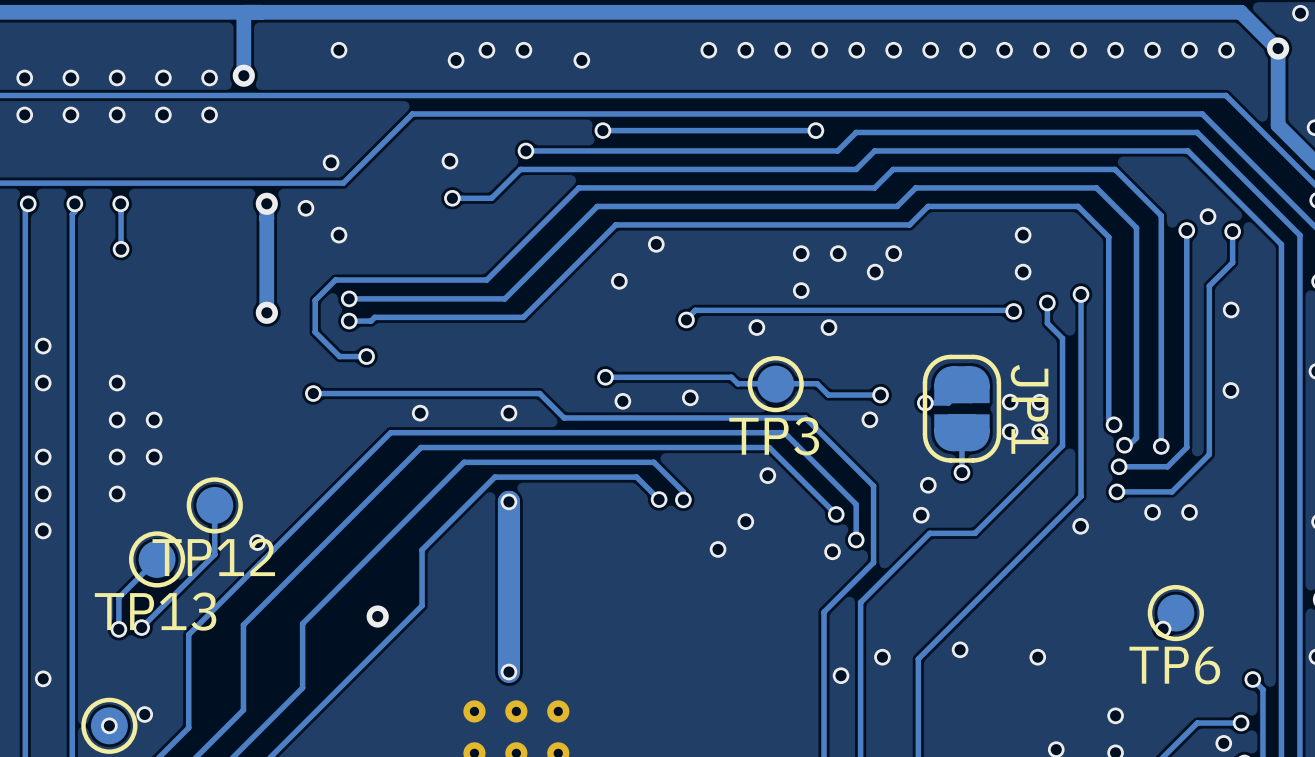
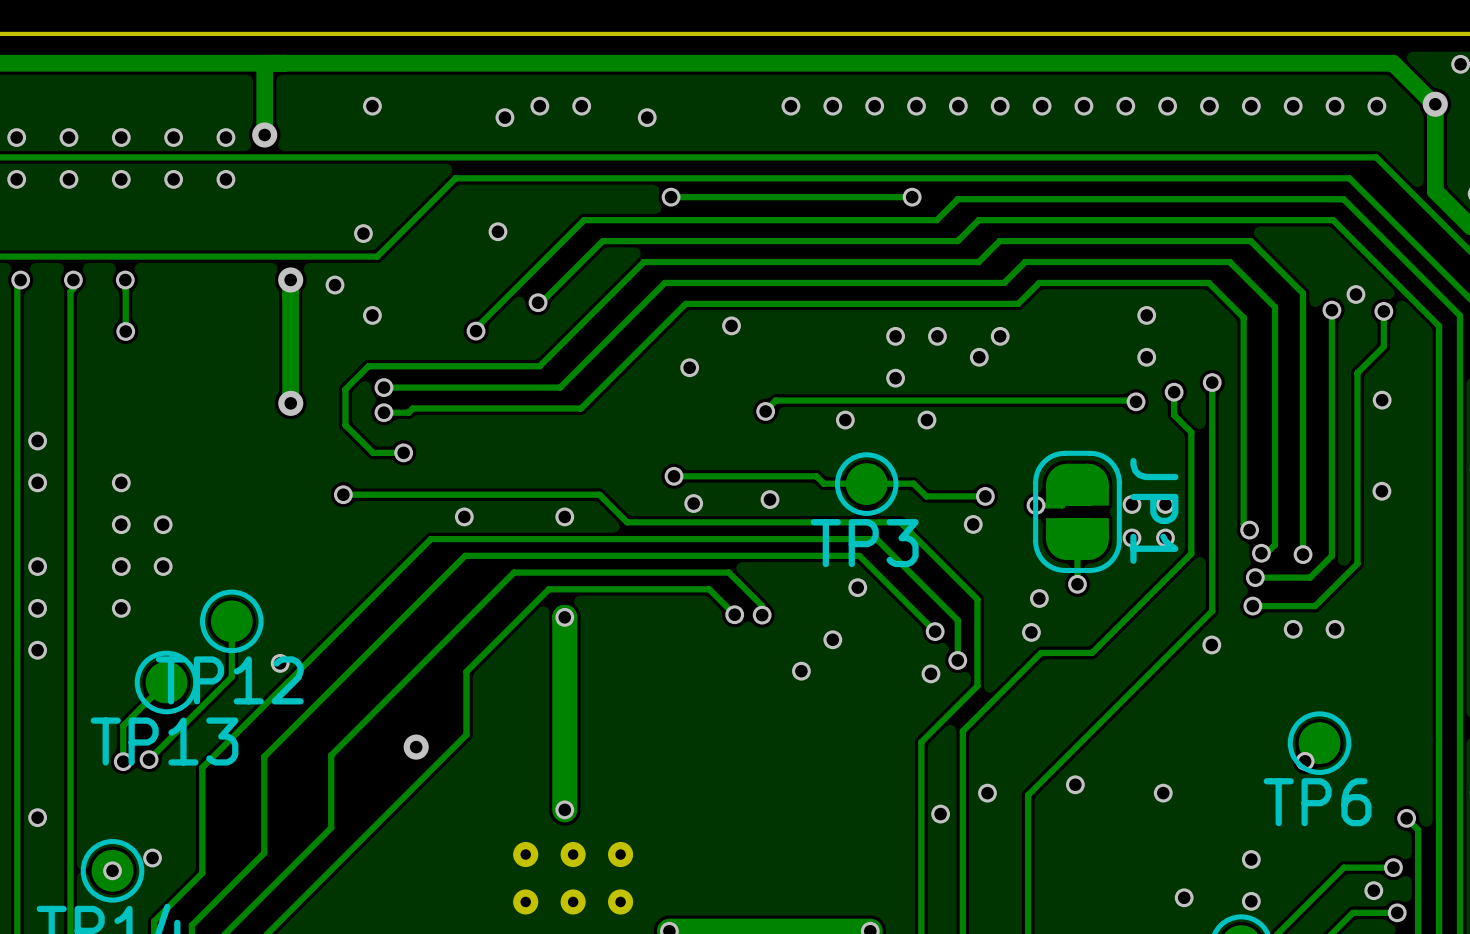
track: none -> (584, 220) (476, 328) (476, 331)
via: (525, 150) -> none
track: (542, 169) (520, 169) (491, 198) (452, 198) -> (602, 241) (541, 302) (538, 302)
via: (452, 198) -> none
via: none -> (538, 302)
via: none -> (476, 331)

